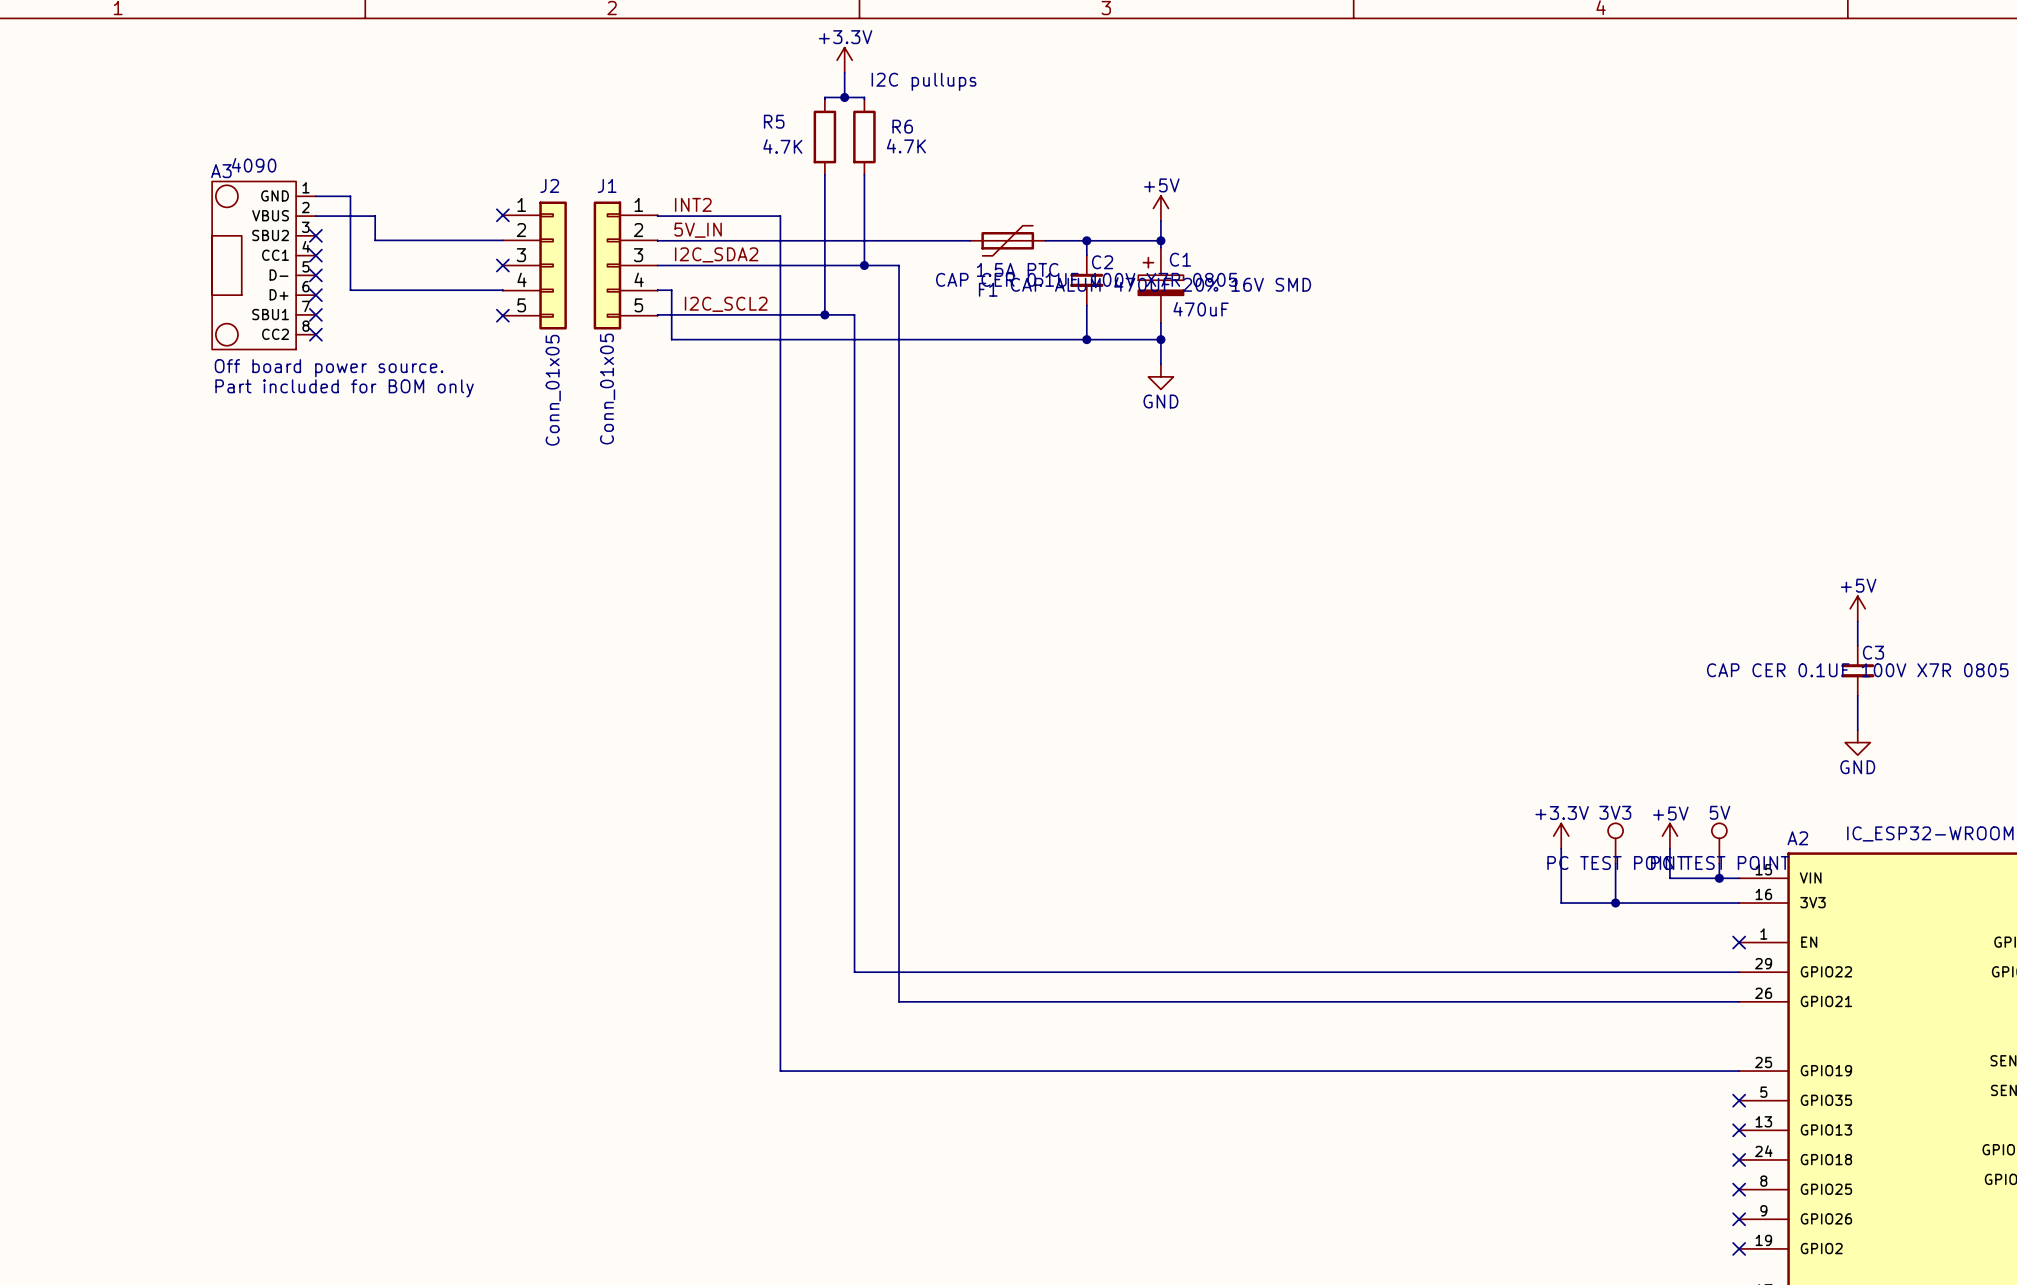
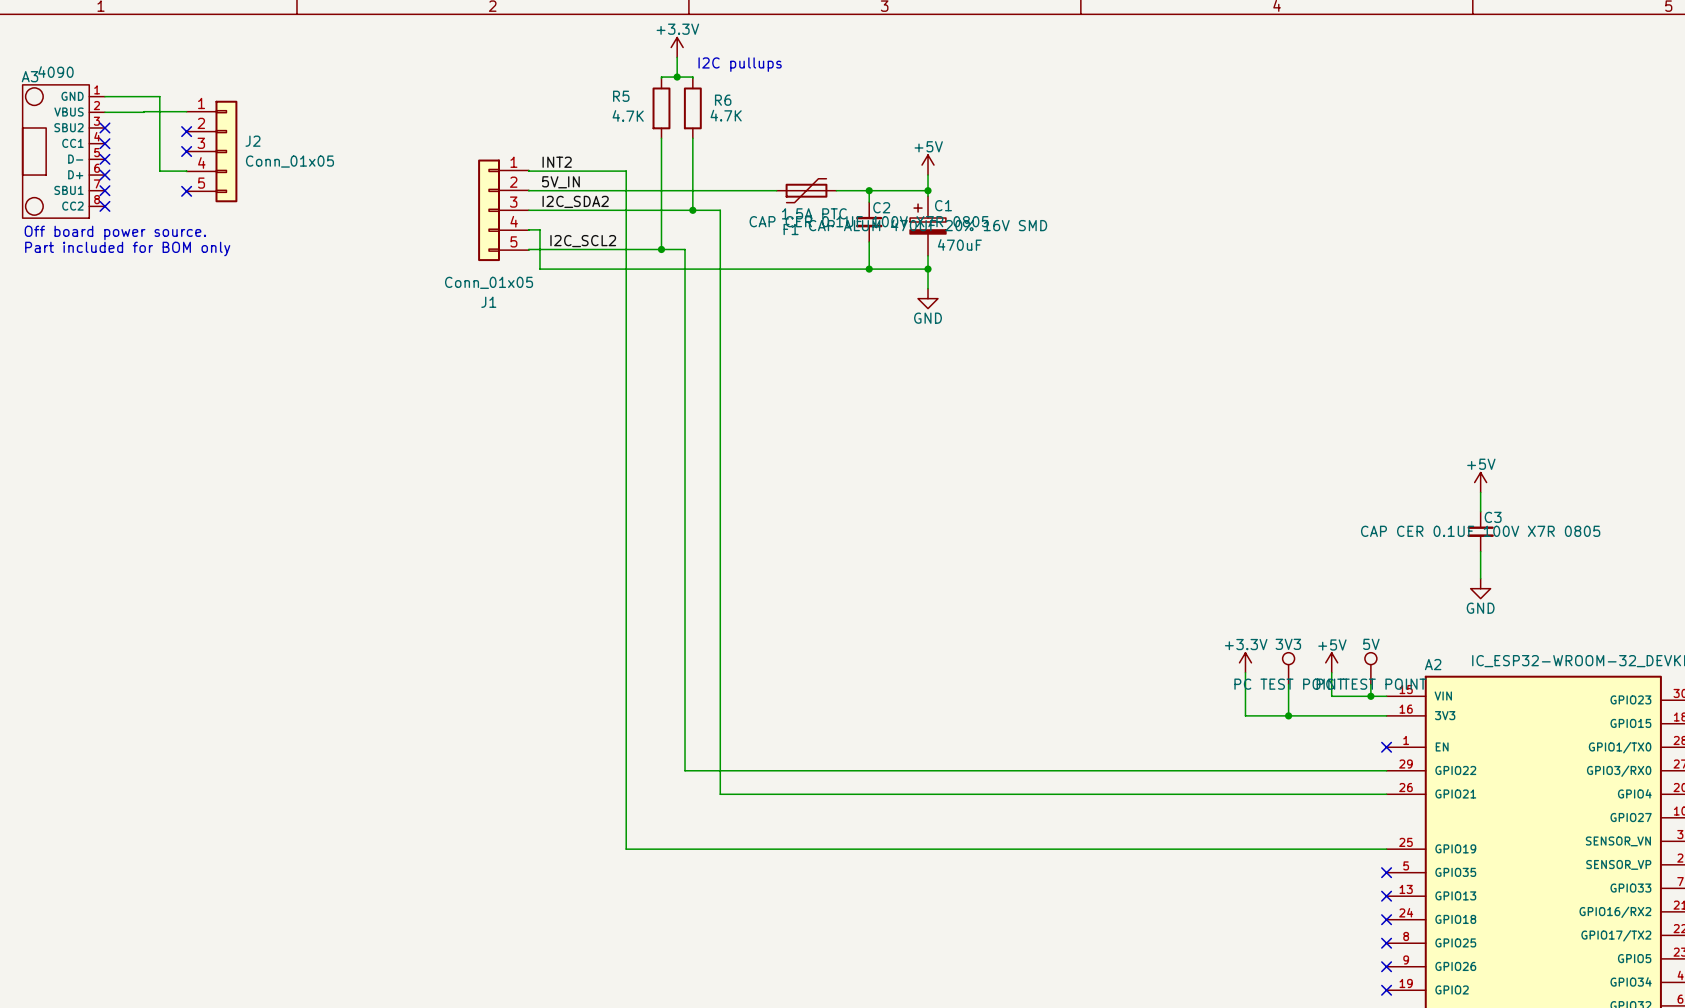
wire: none -> (104, 96) (159, 96) (159, 171) (186, 171)
wire: none -> (186, 111) (104, 112)
no-connect mark: none -> (104, 127)
no-connect mark: none -> (186, 131)
no-connect mark: none -> (104, 143)
J2 name position: J2 (549, 185) -> J2 (253, 141)
J1 name position: J1 (607, 185) -> J1 (488, 302)
no-connect mark: none -> (186, 151)
wire: (315, 196) (350, 196) (350, 290) (502, 290) -> none
no-connect mark: none -> (104, 159)
no-connect mark: (502, 215) -> none
wire: (315, 216) (375, 216) (375, 240) (502, 240) -> none
no-connect mark: none -> (104, 175)
no-connect mark: (315, 235) -> none
no-connect mark: none -> (104, 190)
no-connect mark: none -> (186, 191)
no-connect mark: (315, 255) -> none
no-connect mark: none -> (104, 206)
A3 position: (263, 265) -> (63, 151)
no-connect mark: (502, 265) -> none
J2 position: (534, 265) -> (212, 151)
no-connect mark: (315, 275) -> none
no-connect mark: (315, 295) -> none
no-connect mark: (315, 314) -> none
no-connect mark: (502, 315) -> none
no-connect mark: (315, 334) -> none
text position: Off board power source. (329, 368) -> Off board power source. (115, 232)
text position: Part included for BOM only (344, 388) -> Part included for BOM only (127, 248)
J1 value rotation: 0° (607, 389) -> 90° clockwise (489, 282)
J2 value rotation: 0° (553, 390) -> 90° clockwise (289, 161)
J2 value position: Conn_01x05 (553, 390) -> Conn_01x05 (289, 161)

